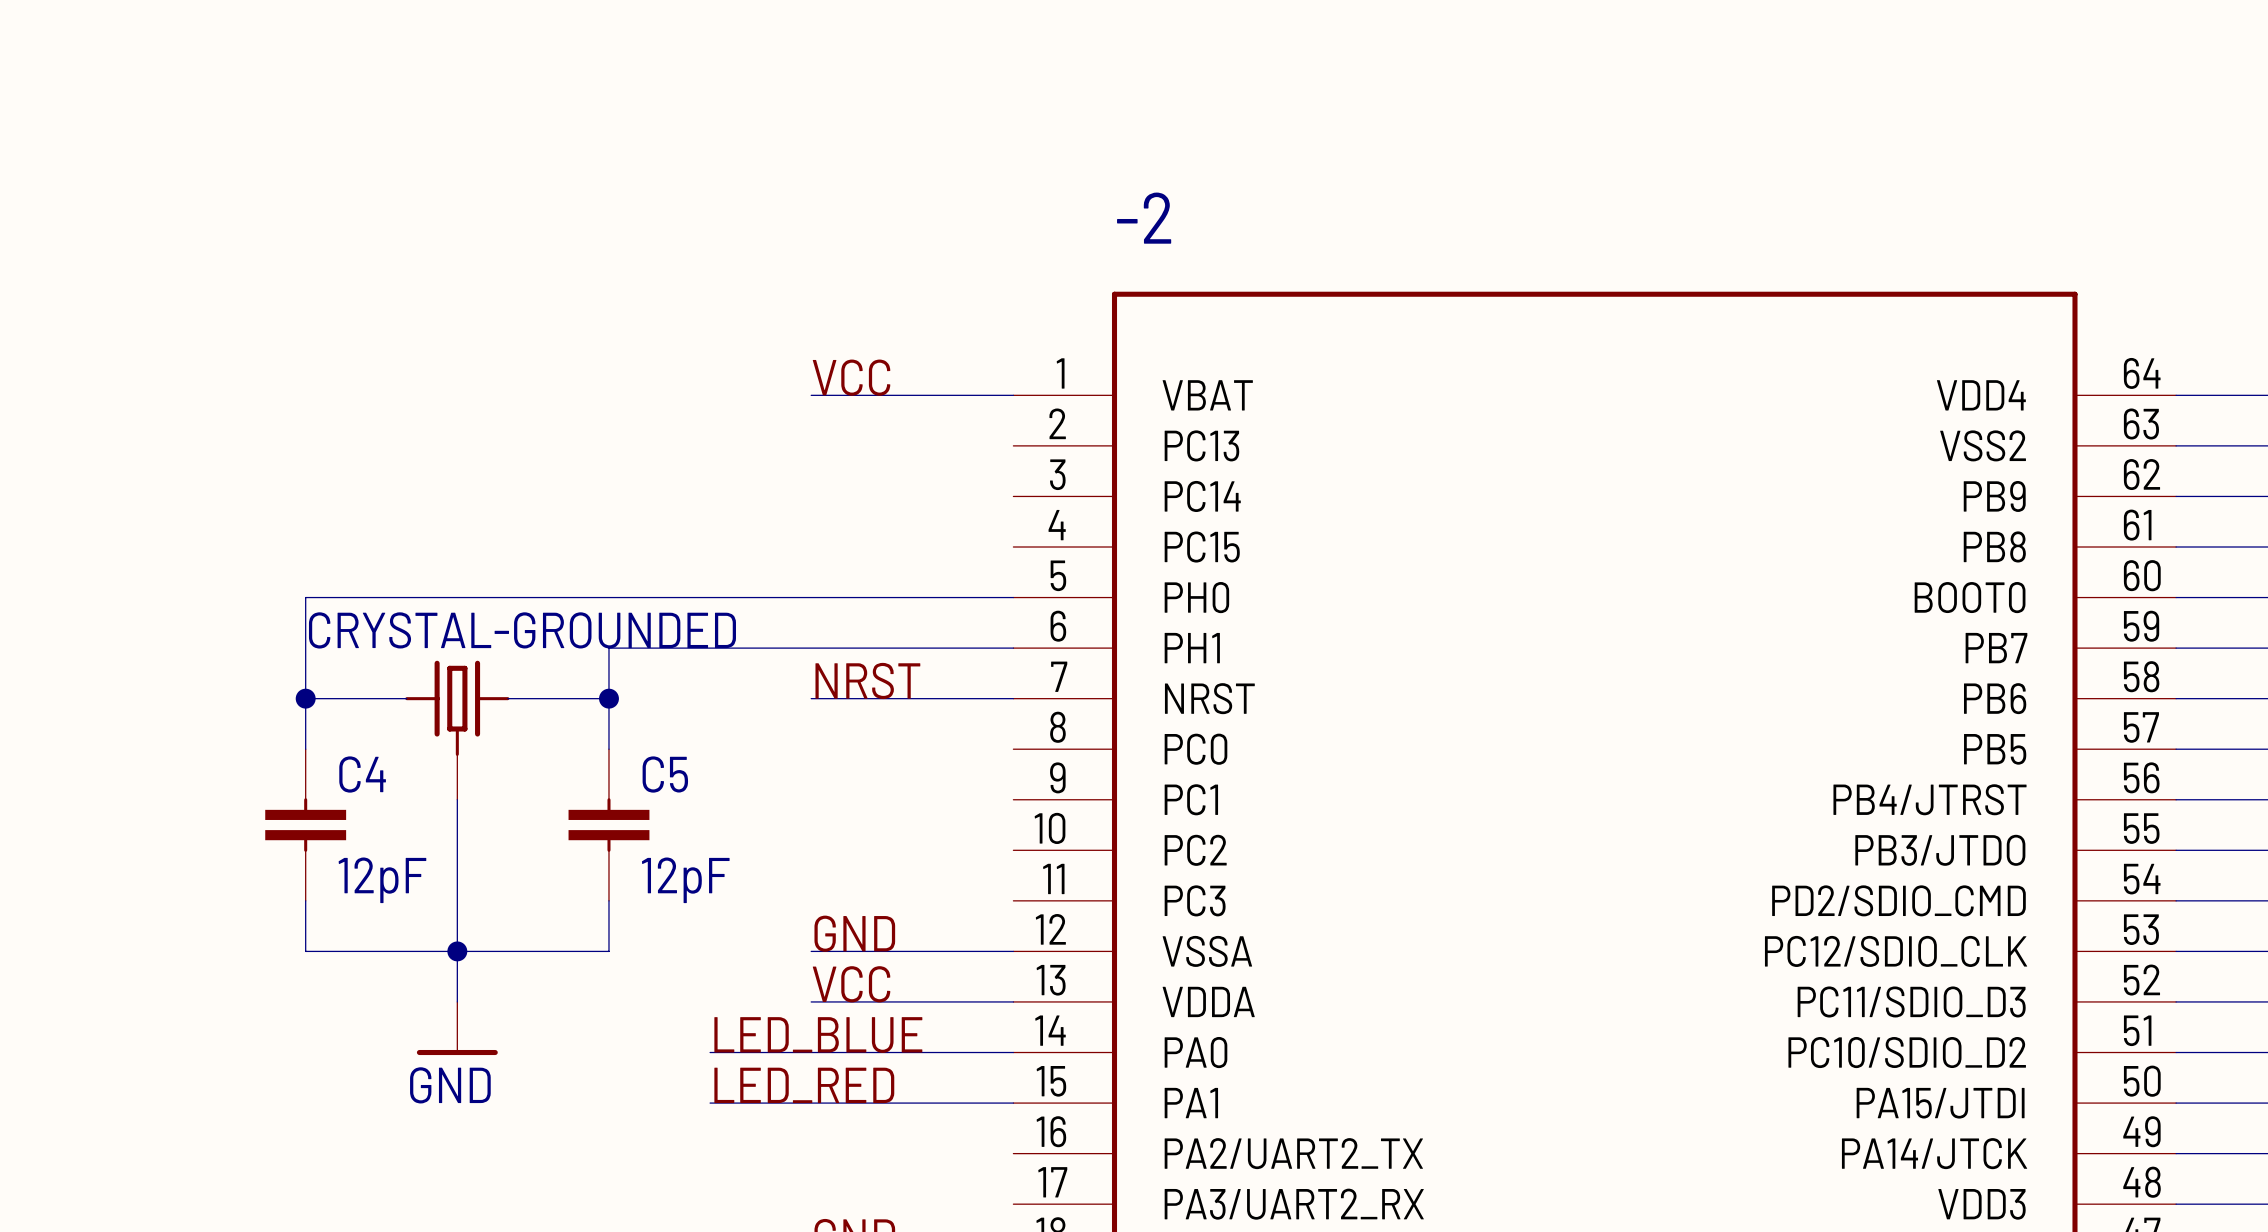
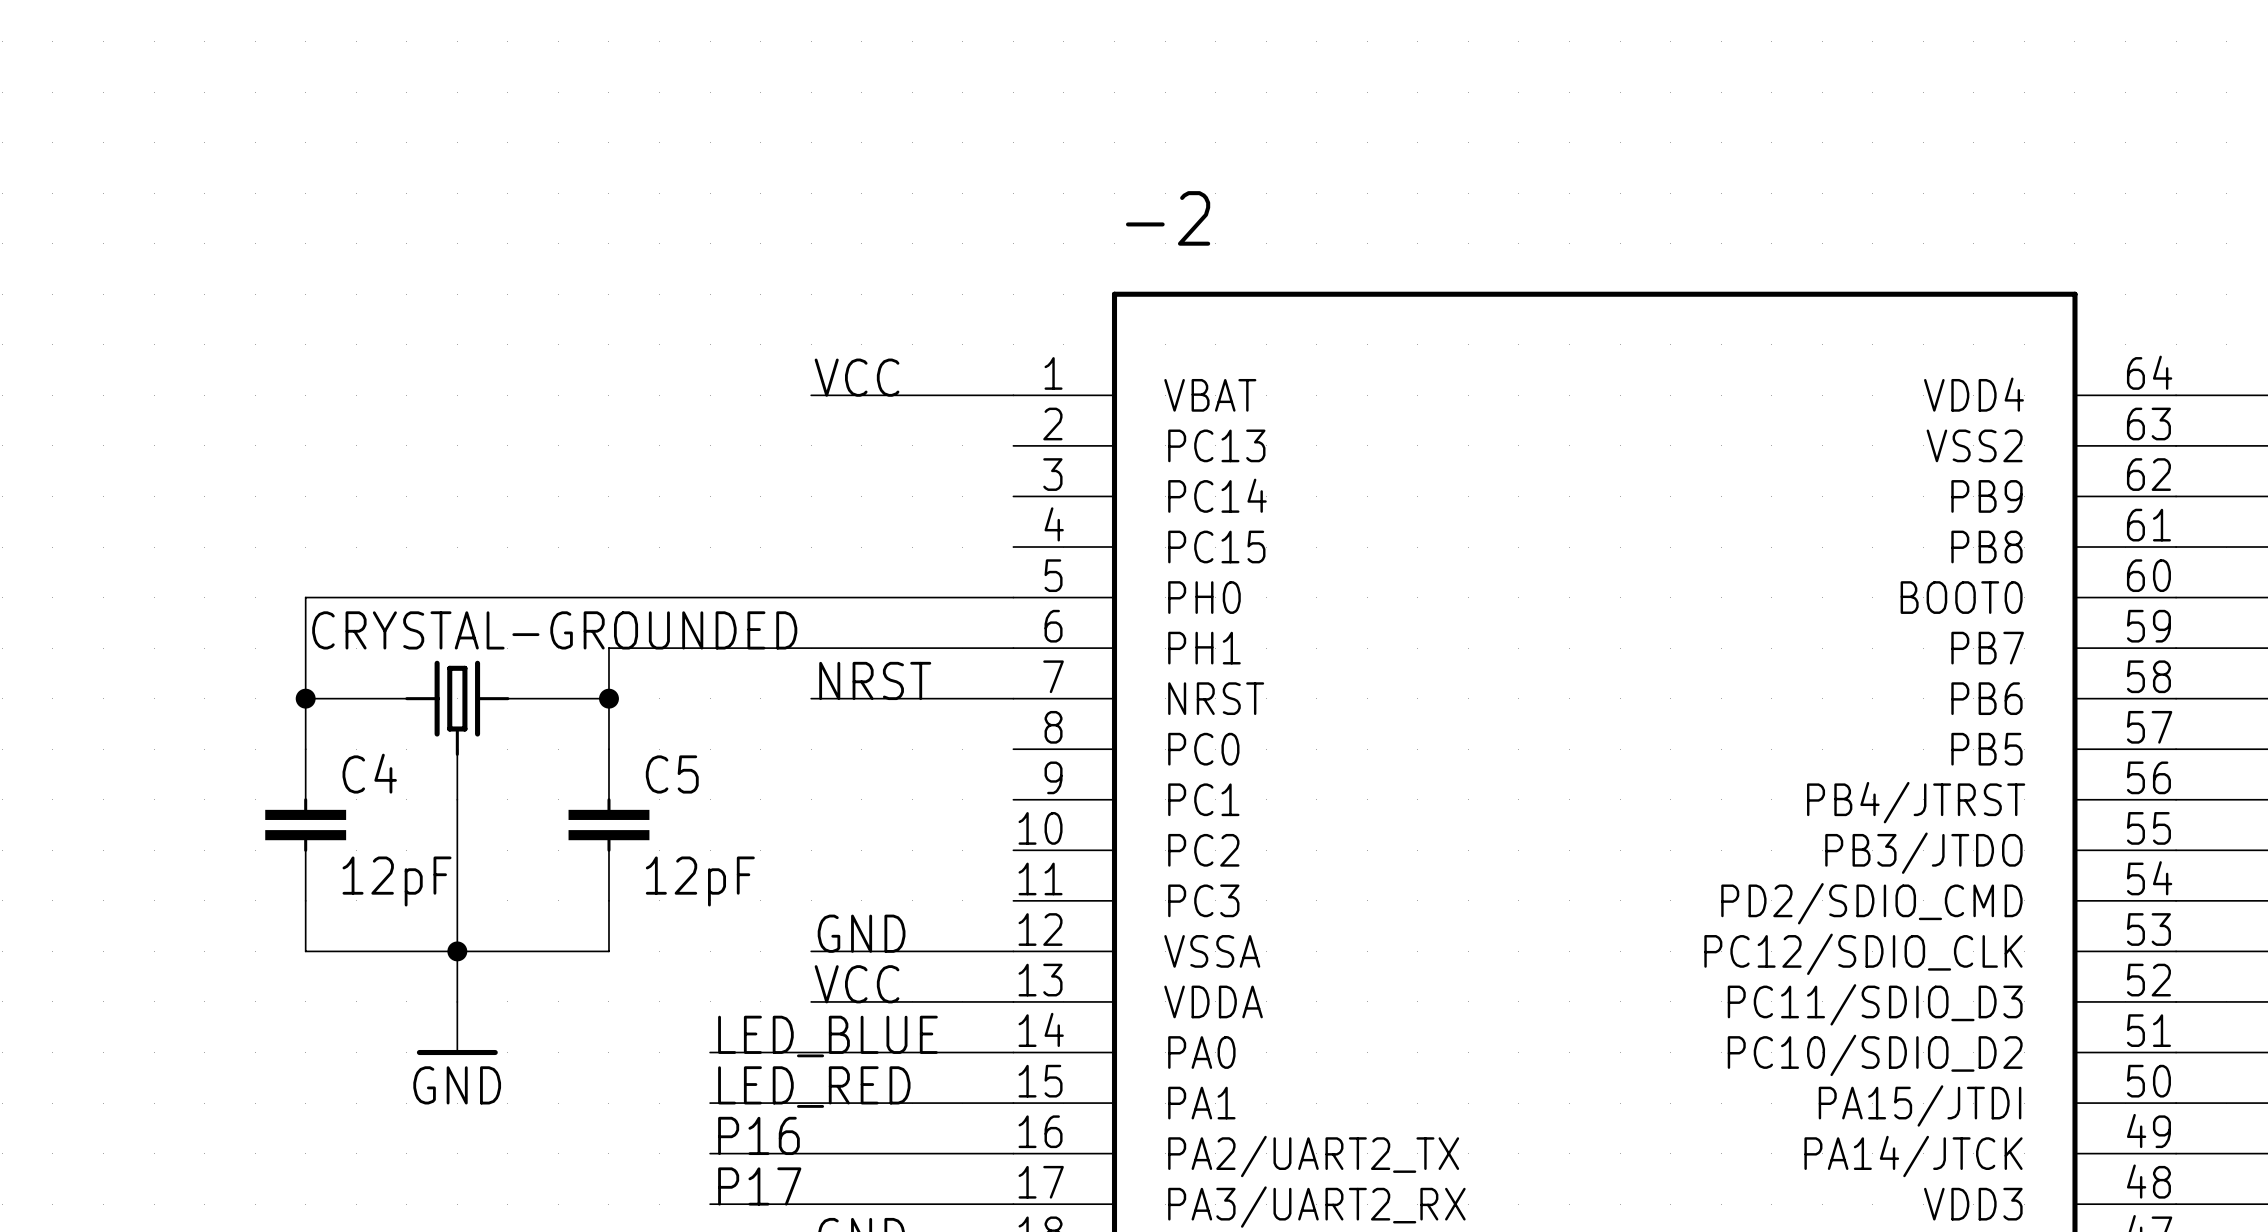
label: none -> P16 (758, 1135)
wire: none -> (710, 1153) (1013, 1153)
label: none -> P17 (759, 1186)
wire: none -> (710, 1204) (1013, 1204)

